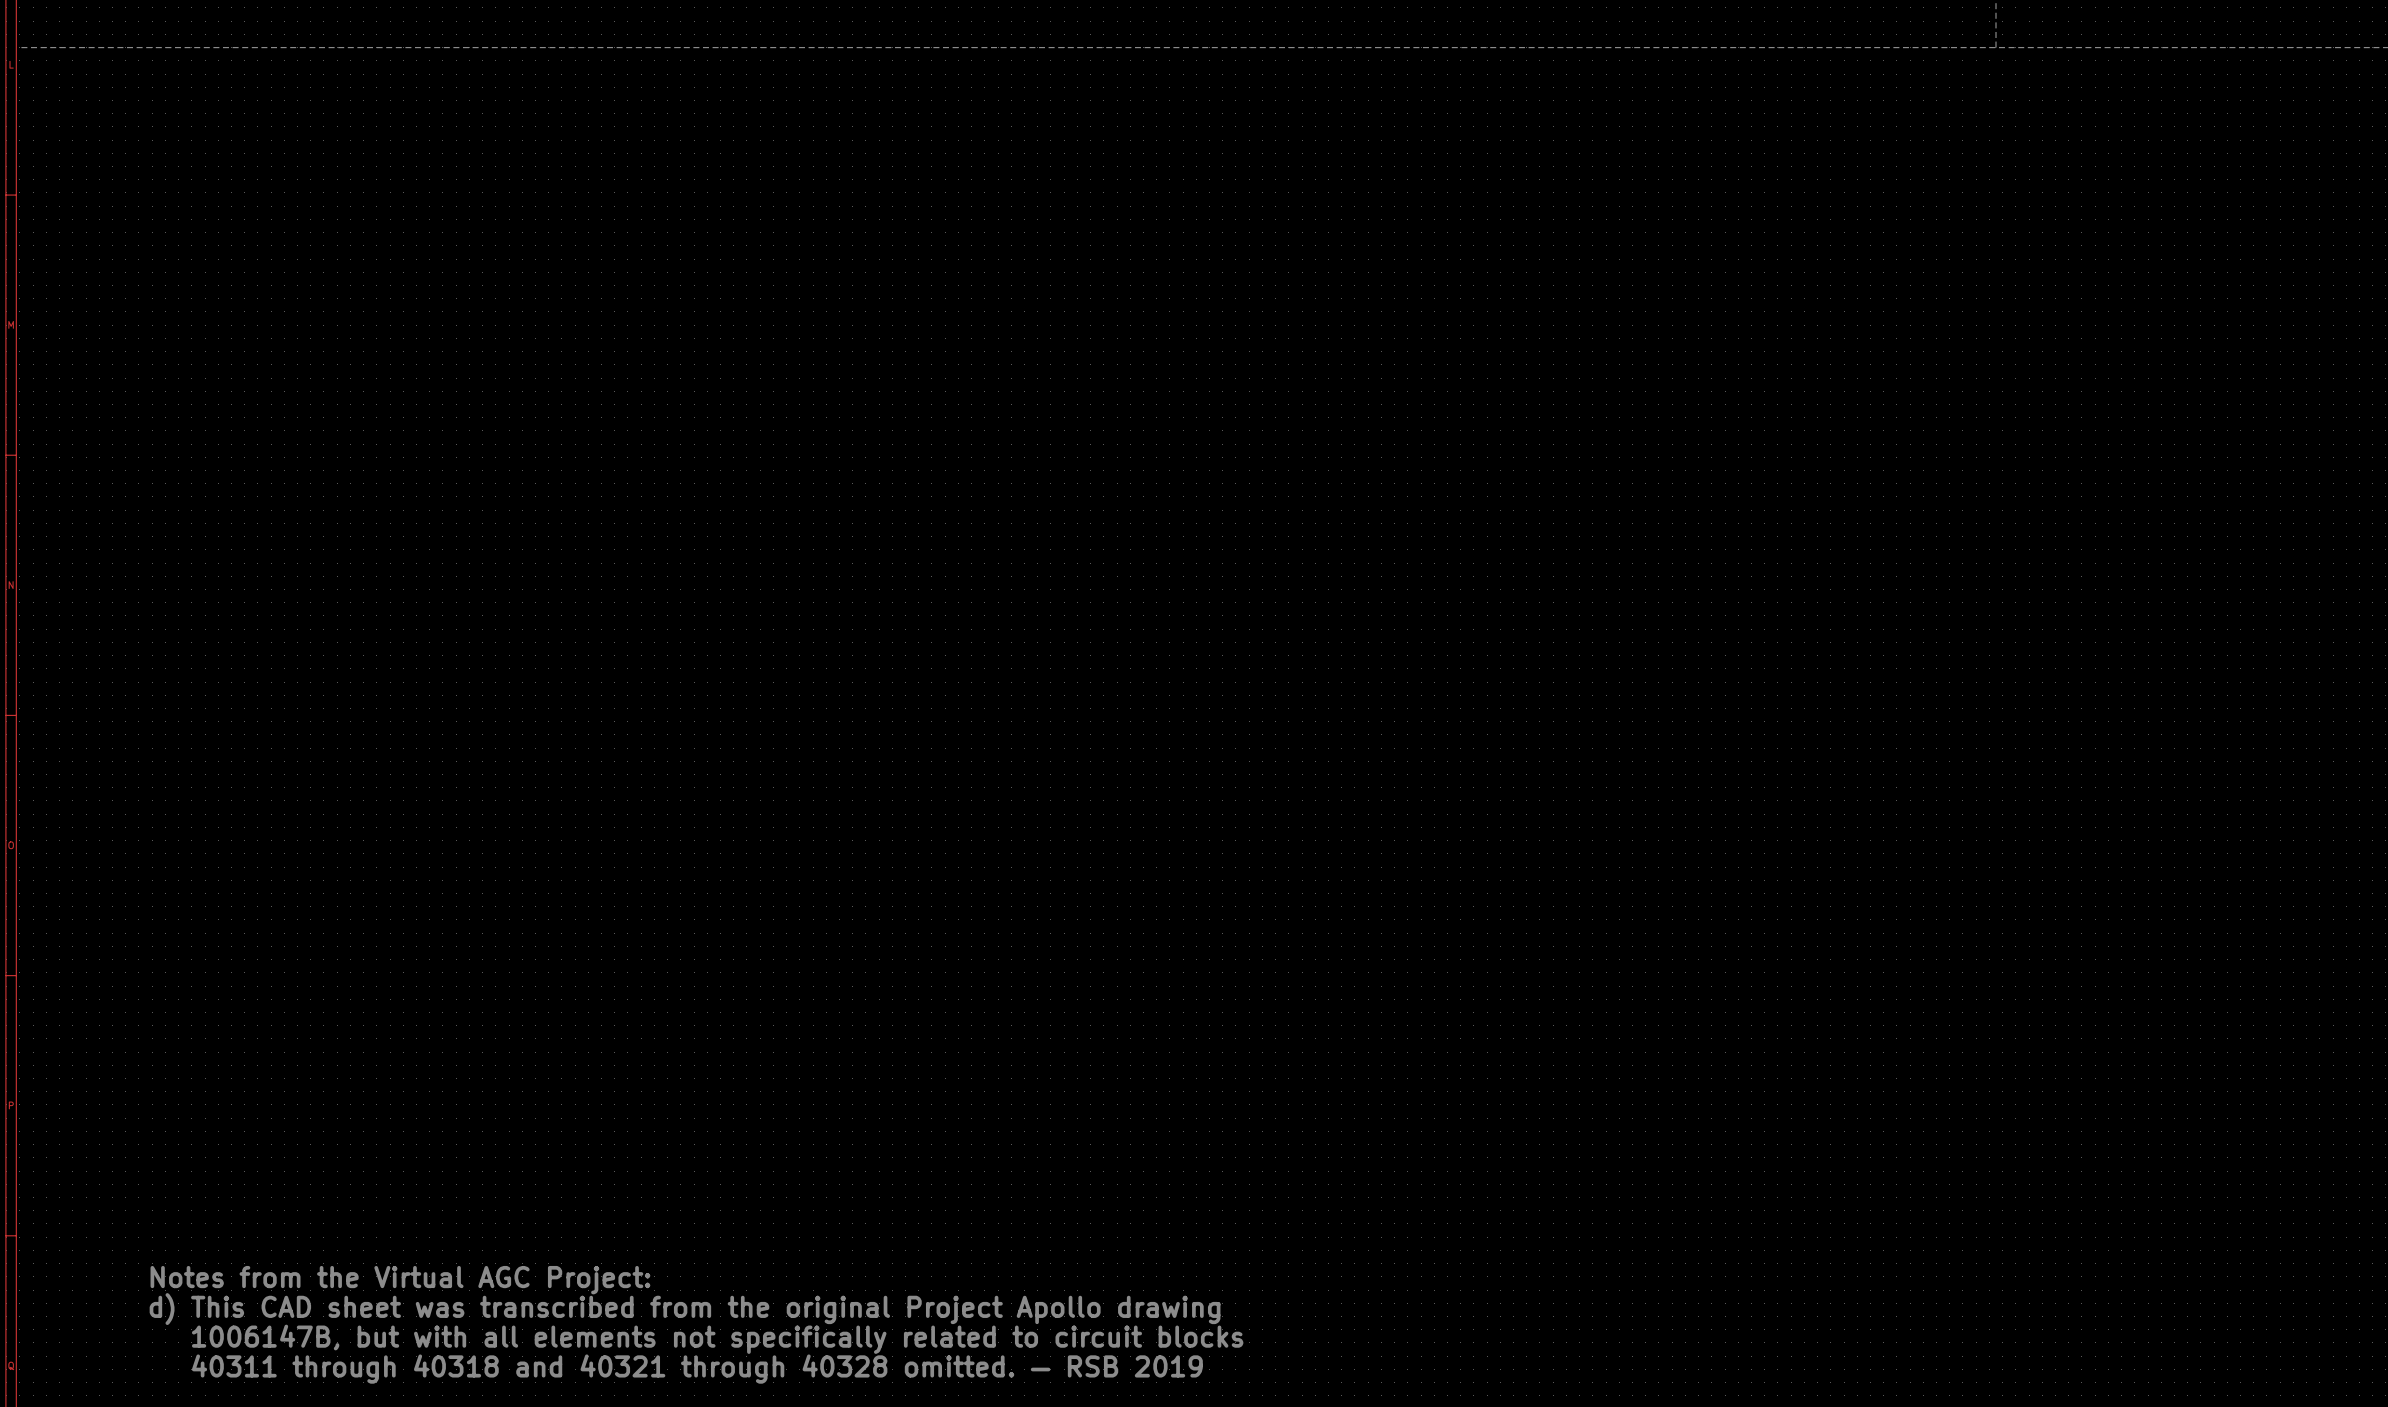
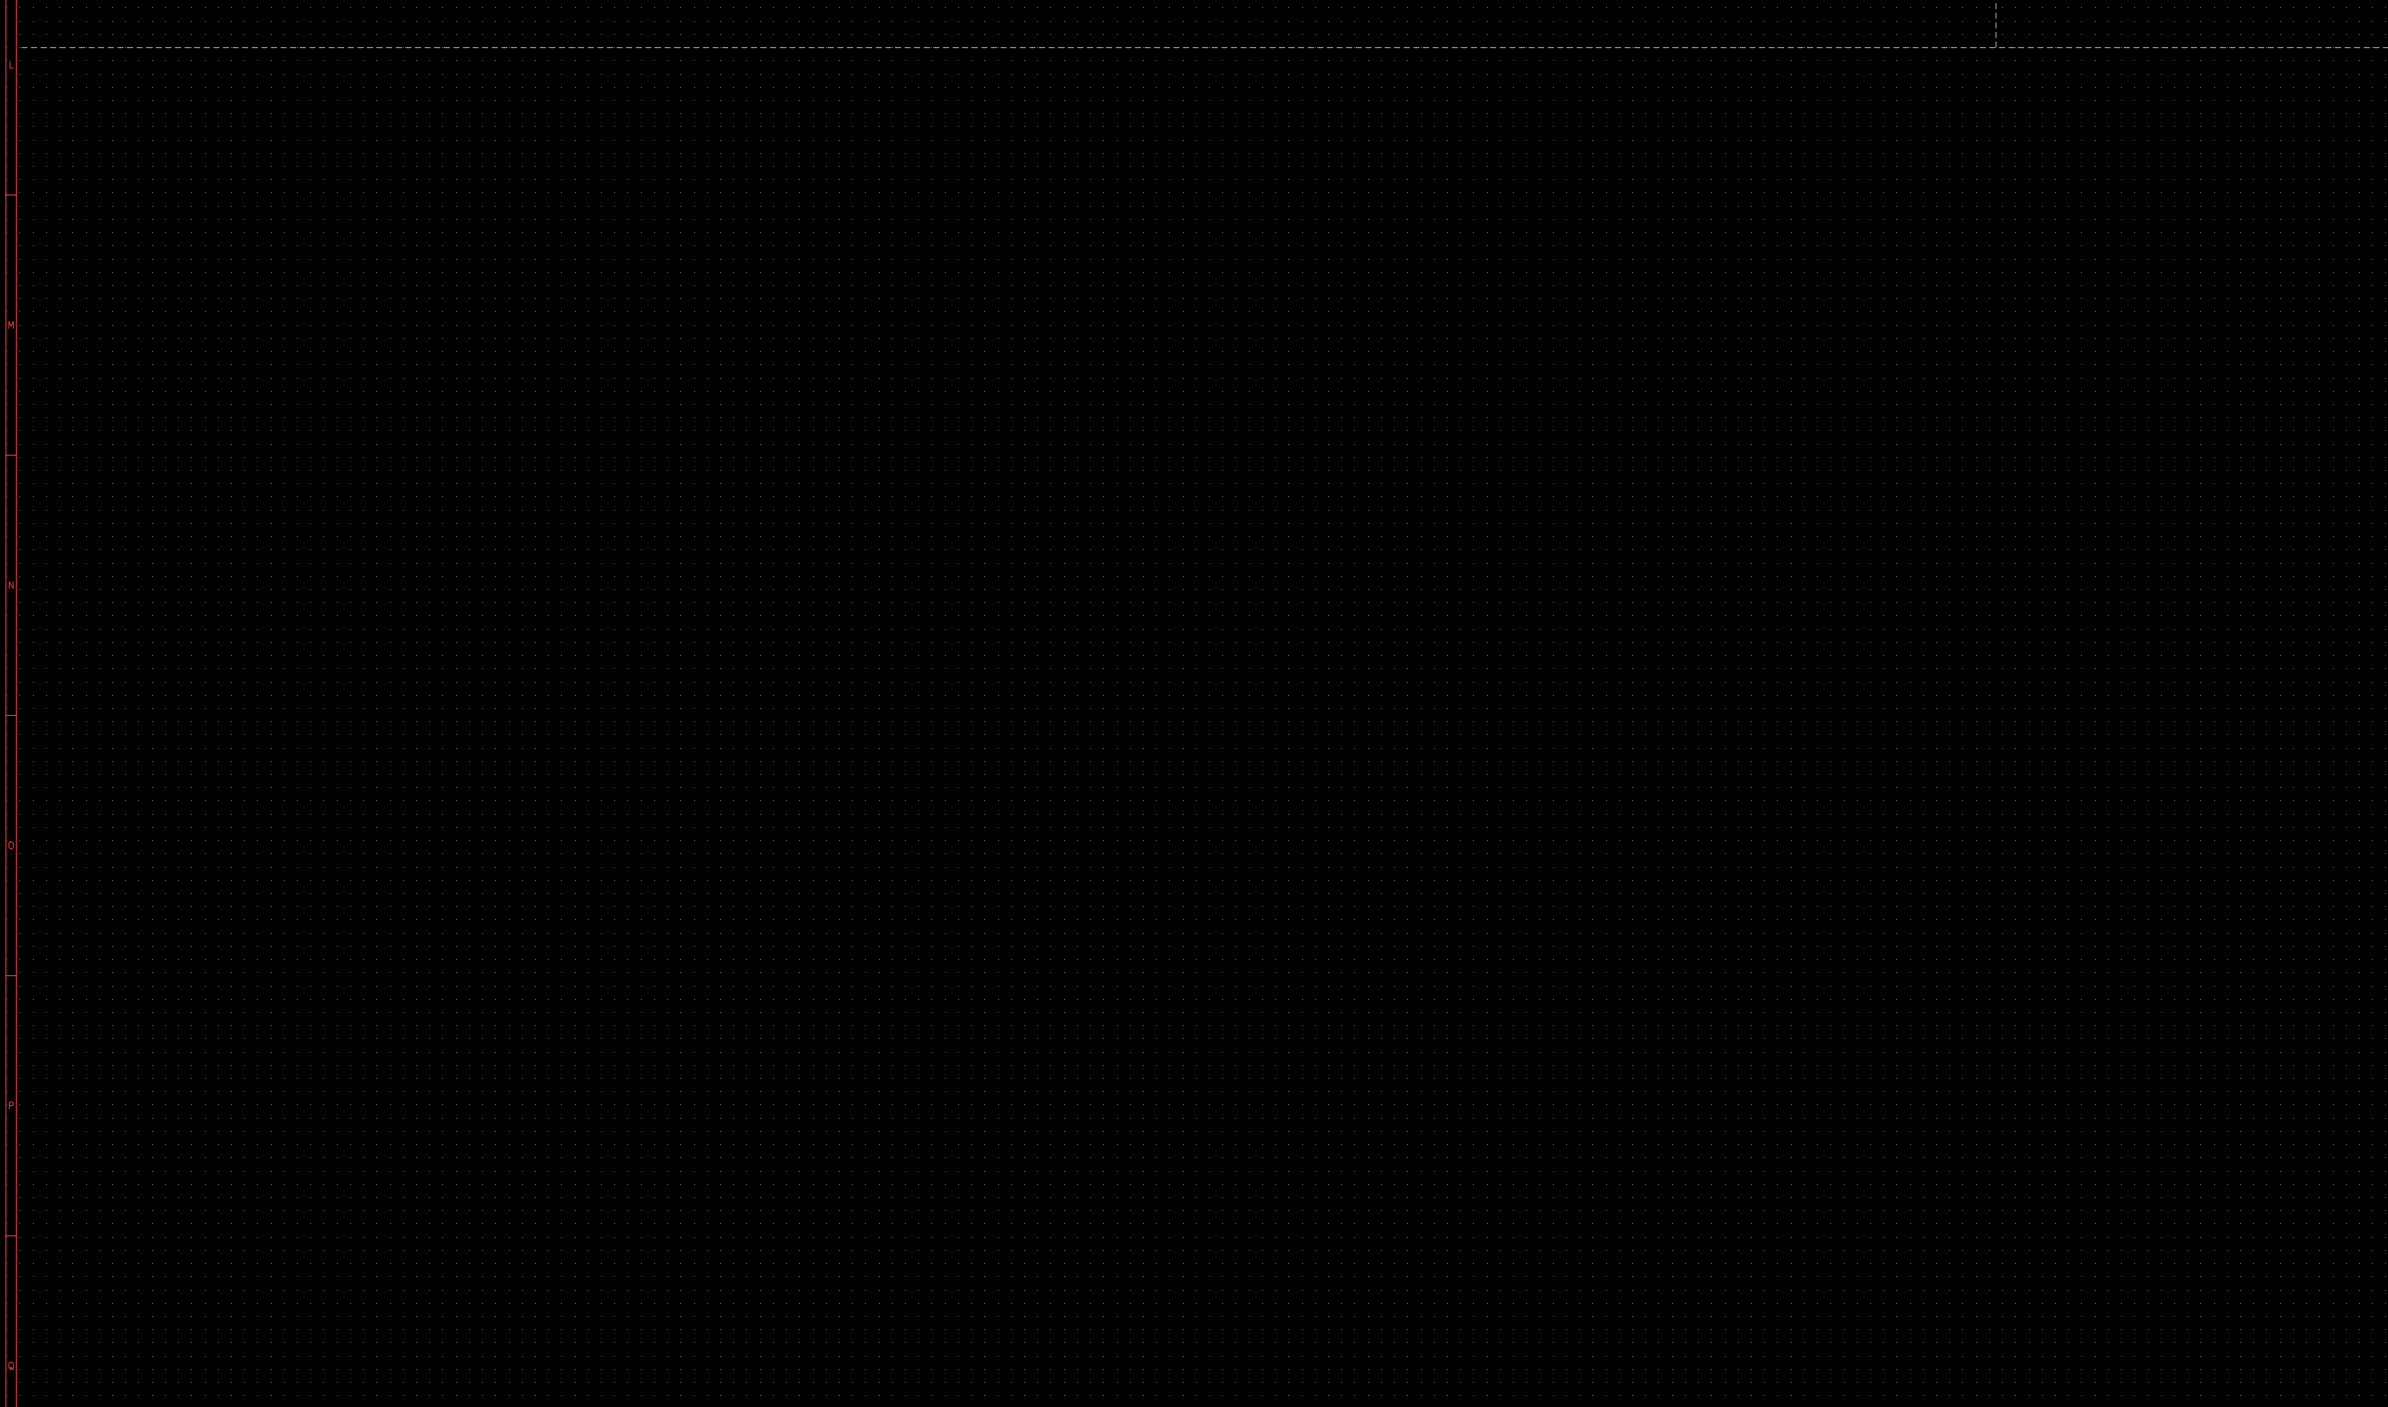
text: Notes from the Virtual AGC Project: (400, 1280) -> none
text: d) This CAD sheet was transcribed from the original Project Apollo drawing (685, 1309) -> none
text: 1006147B, but with all elements not specifically related to circuit blocks (717, 1339) -> none
text: 40311 through 40318 and 40321 through 40328 omitted. — RSB 2019 (697, 1369) -> none

